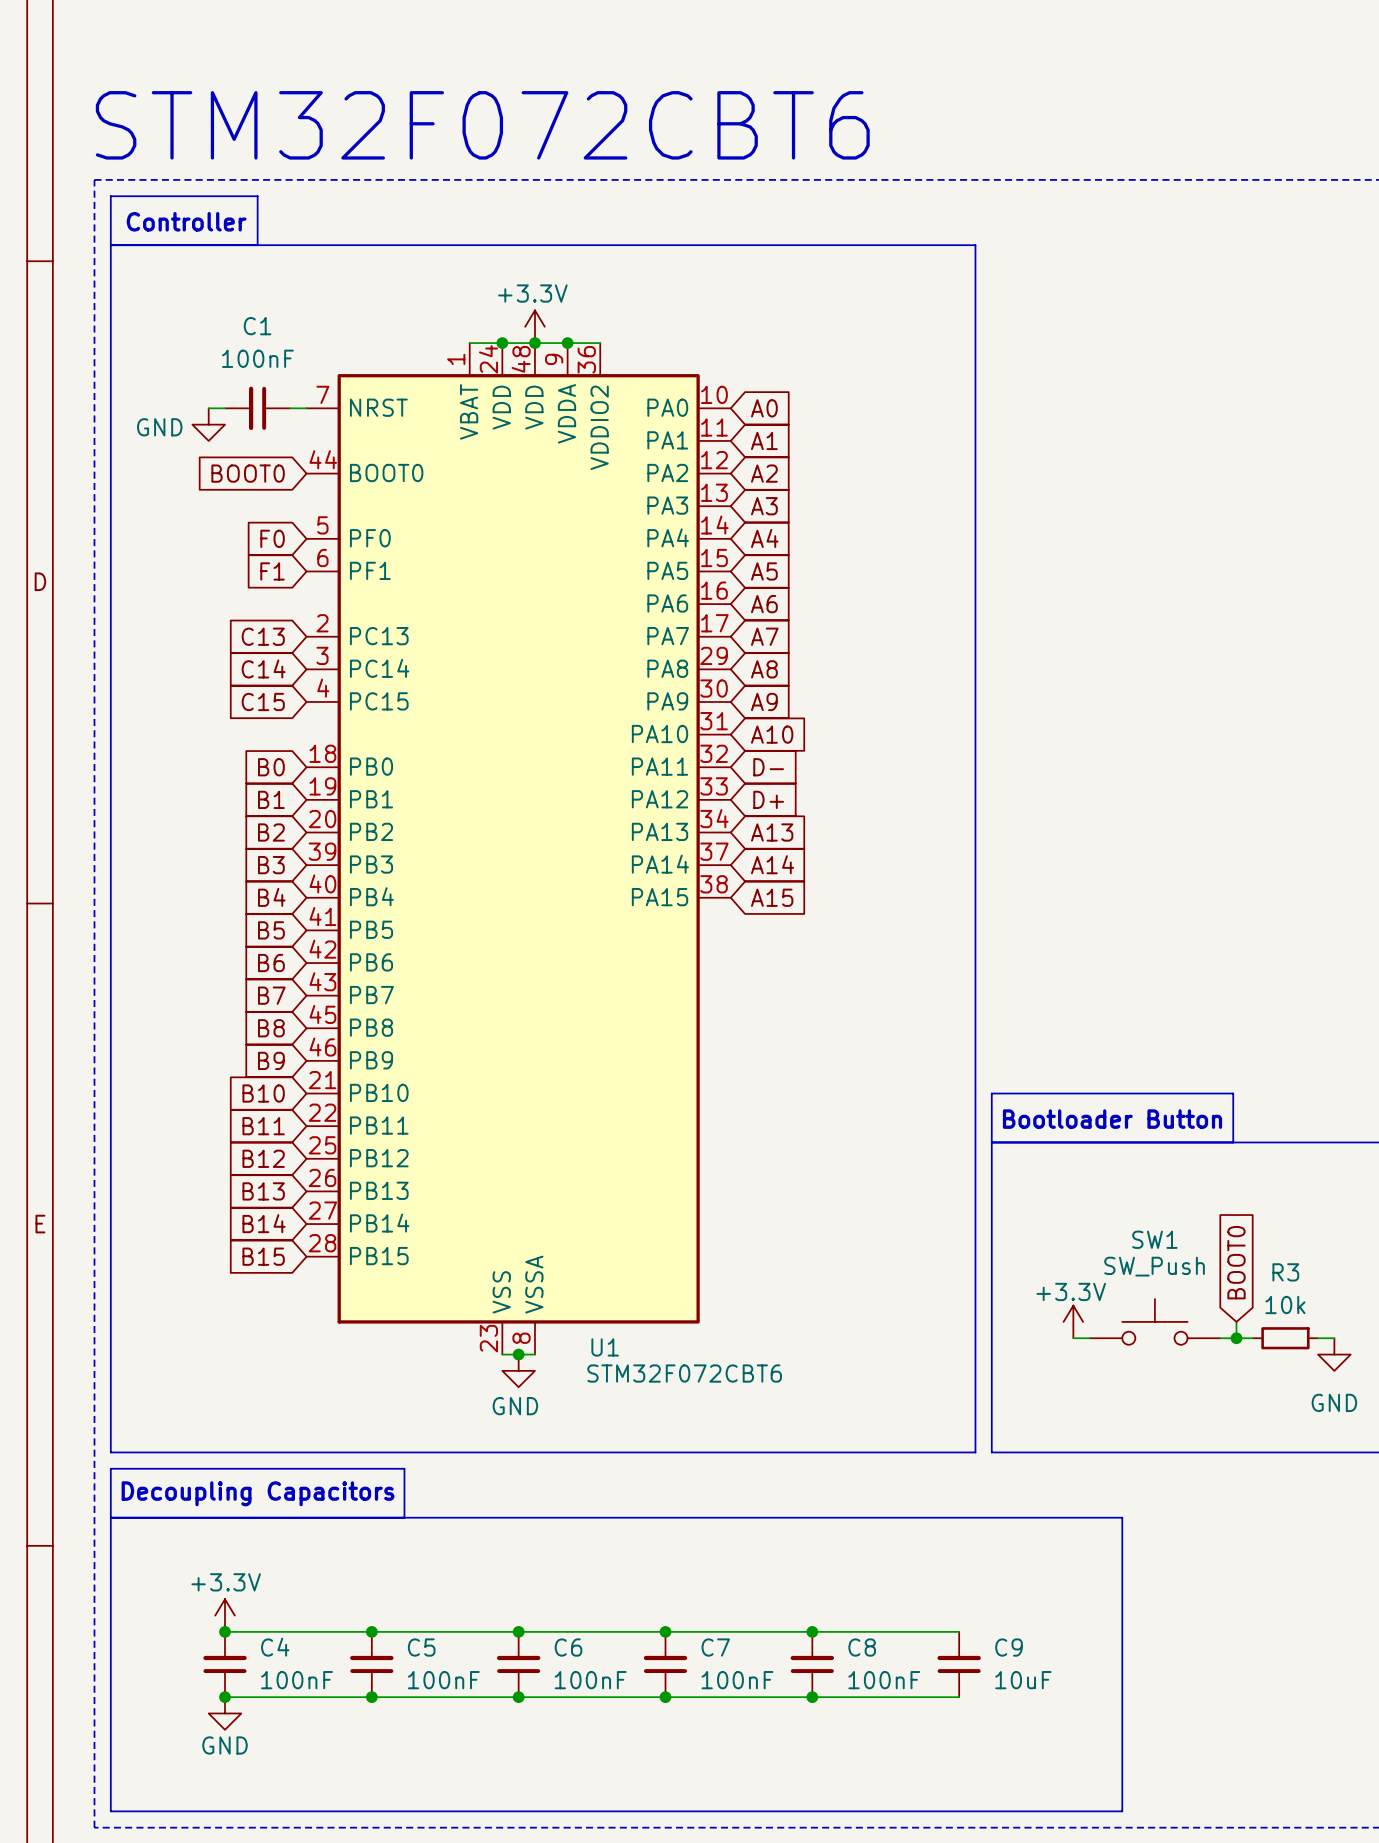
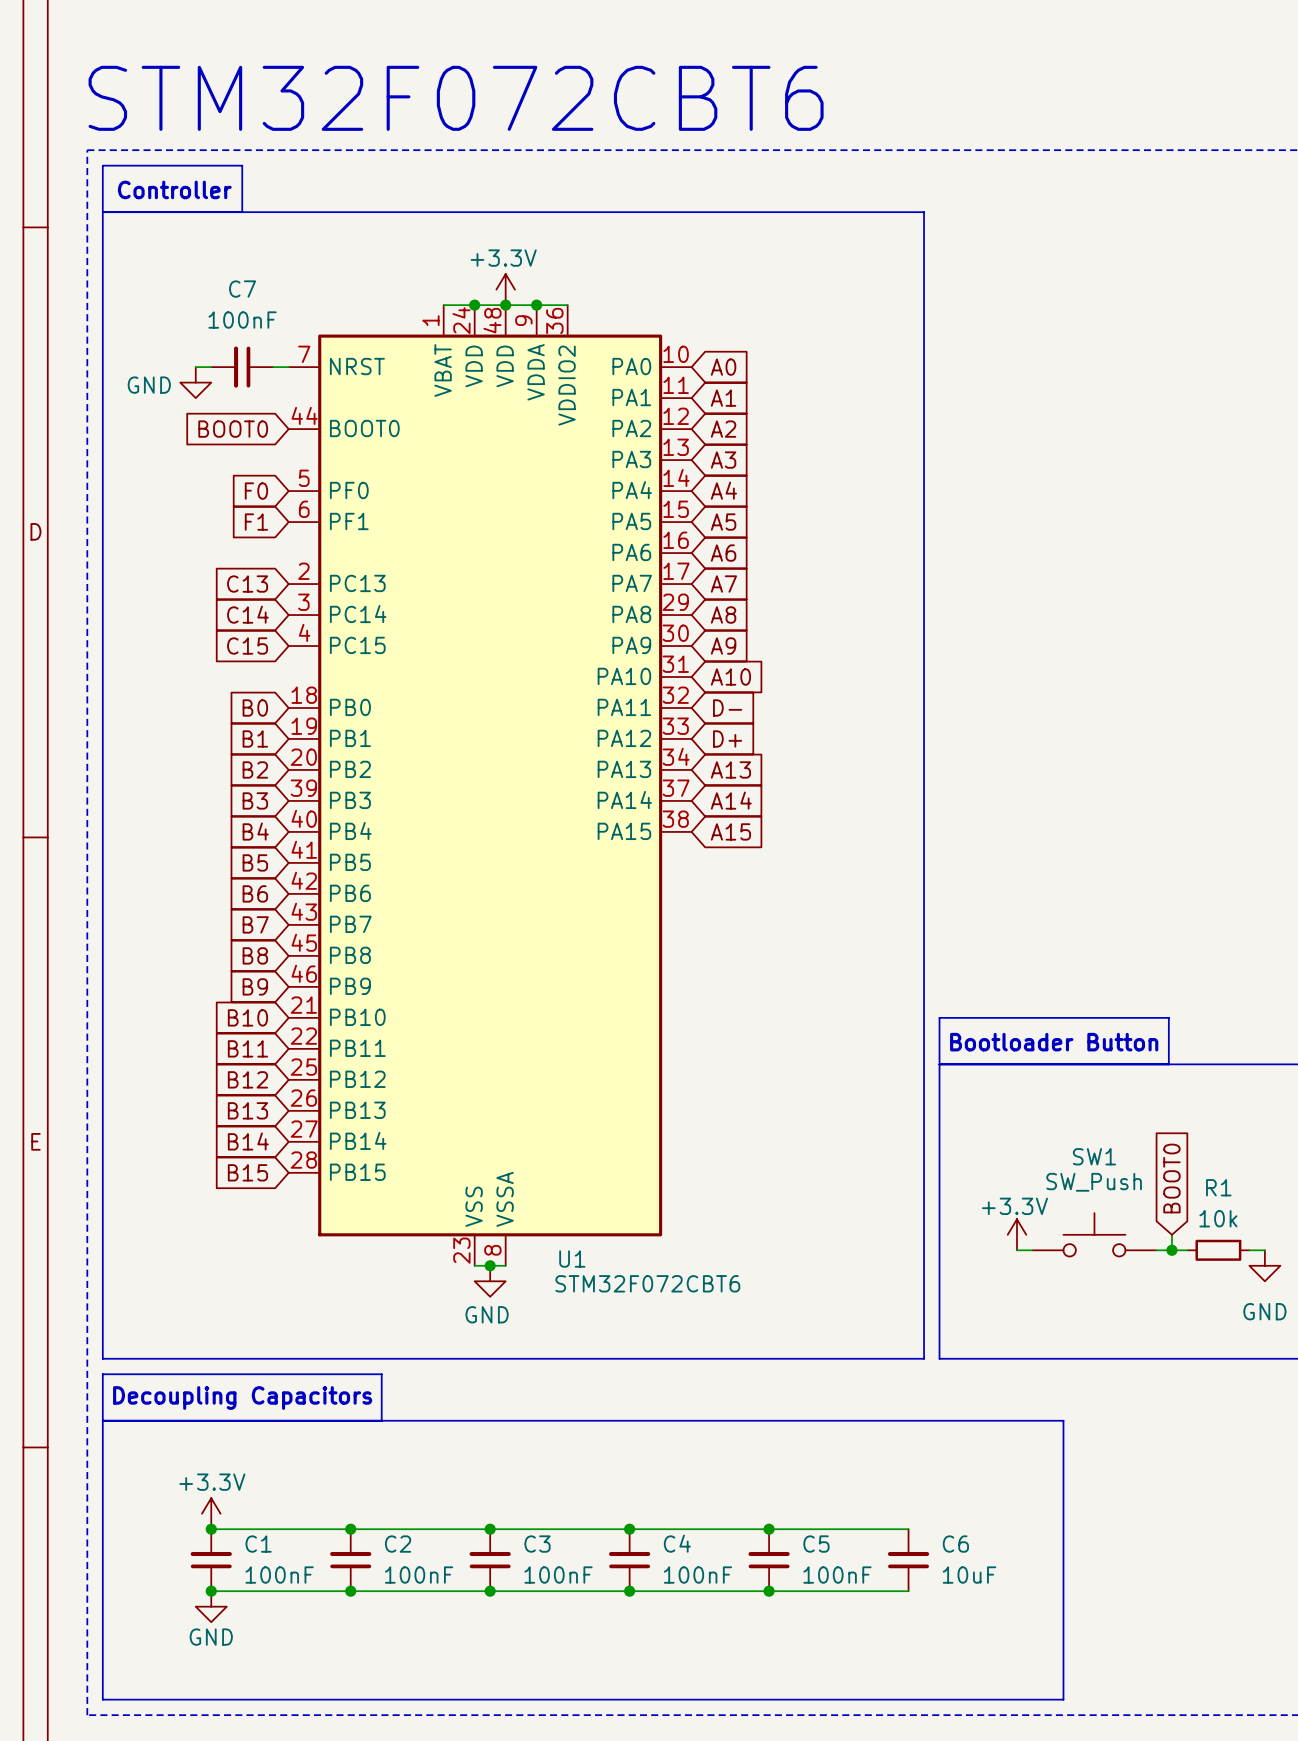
C1 name: C1 (257, 326) -> C7 (242, 289)
R3 name: R3 (1285, 1272) -> R1 (1218, 1187)
C4 name: C4 (275, 1647) -> C1 (258, 1544)
C5 name: C5 (421, 1647) -> C2 (398, 1544)
C6 name: C6 (568, 1647) -> C3 (537, 1544)
C7 name: C7 (715, 1647) -> C4 (677, 1543)
C8 name: C8 (862, 1647) -> C5 (816, 1544)
C9 name: C9 (1008, 1647) -> C6 (955, 1544)

